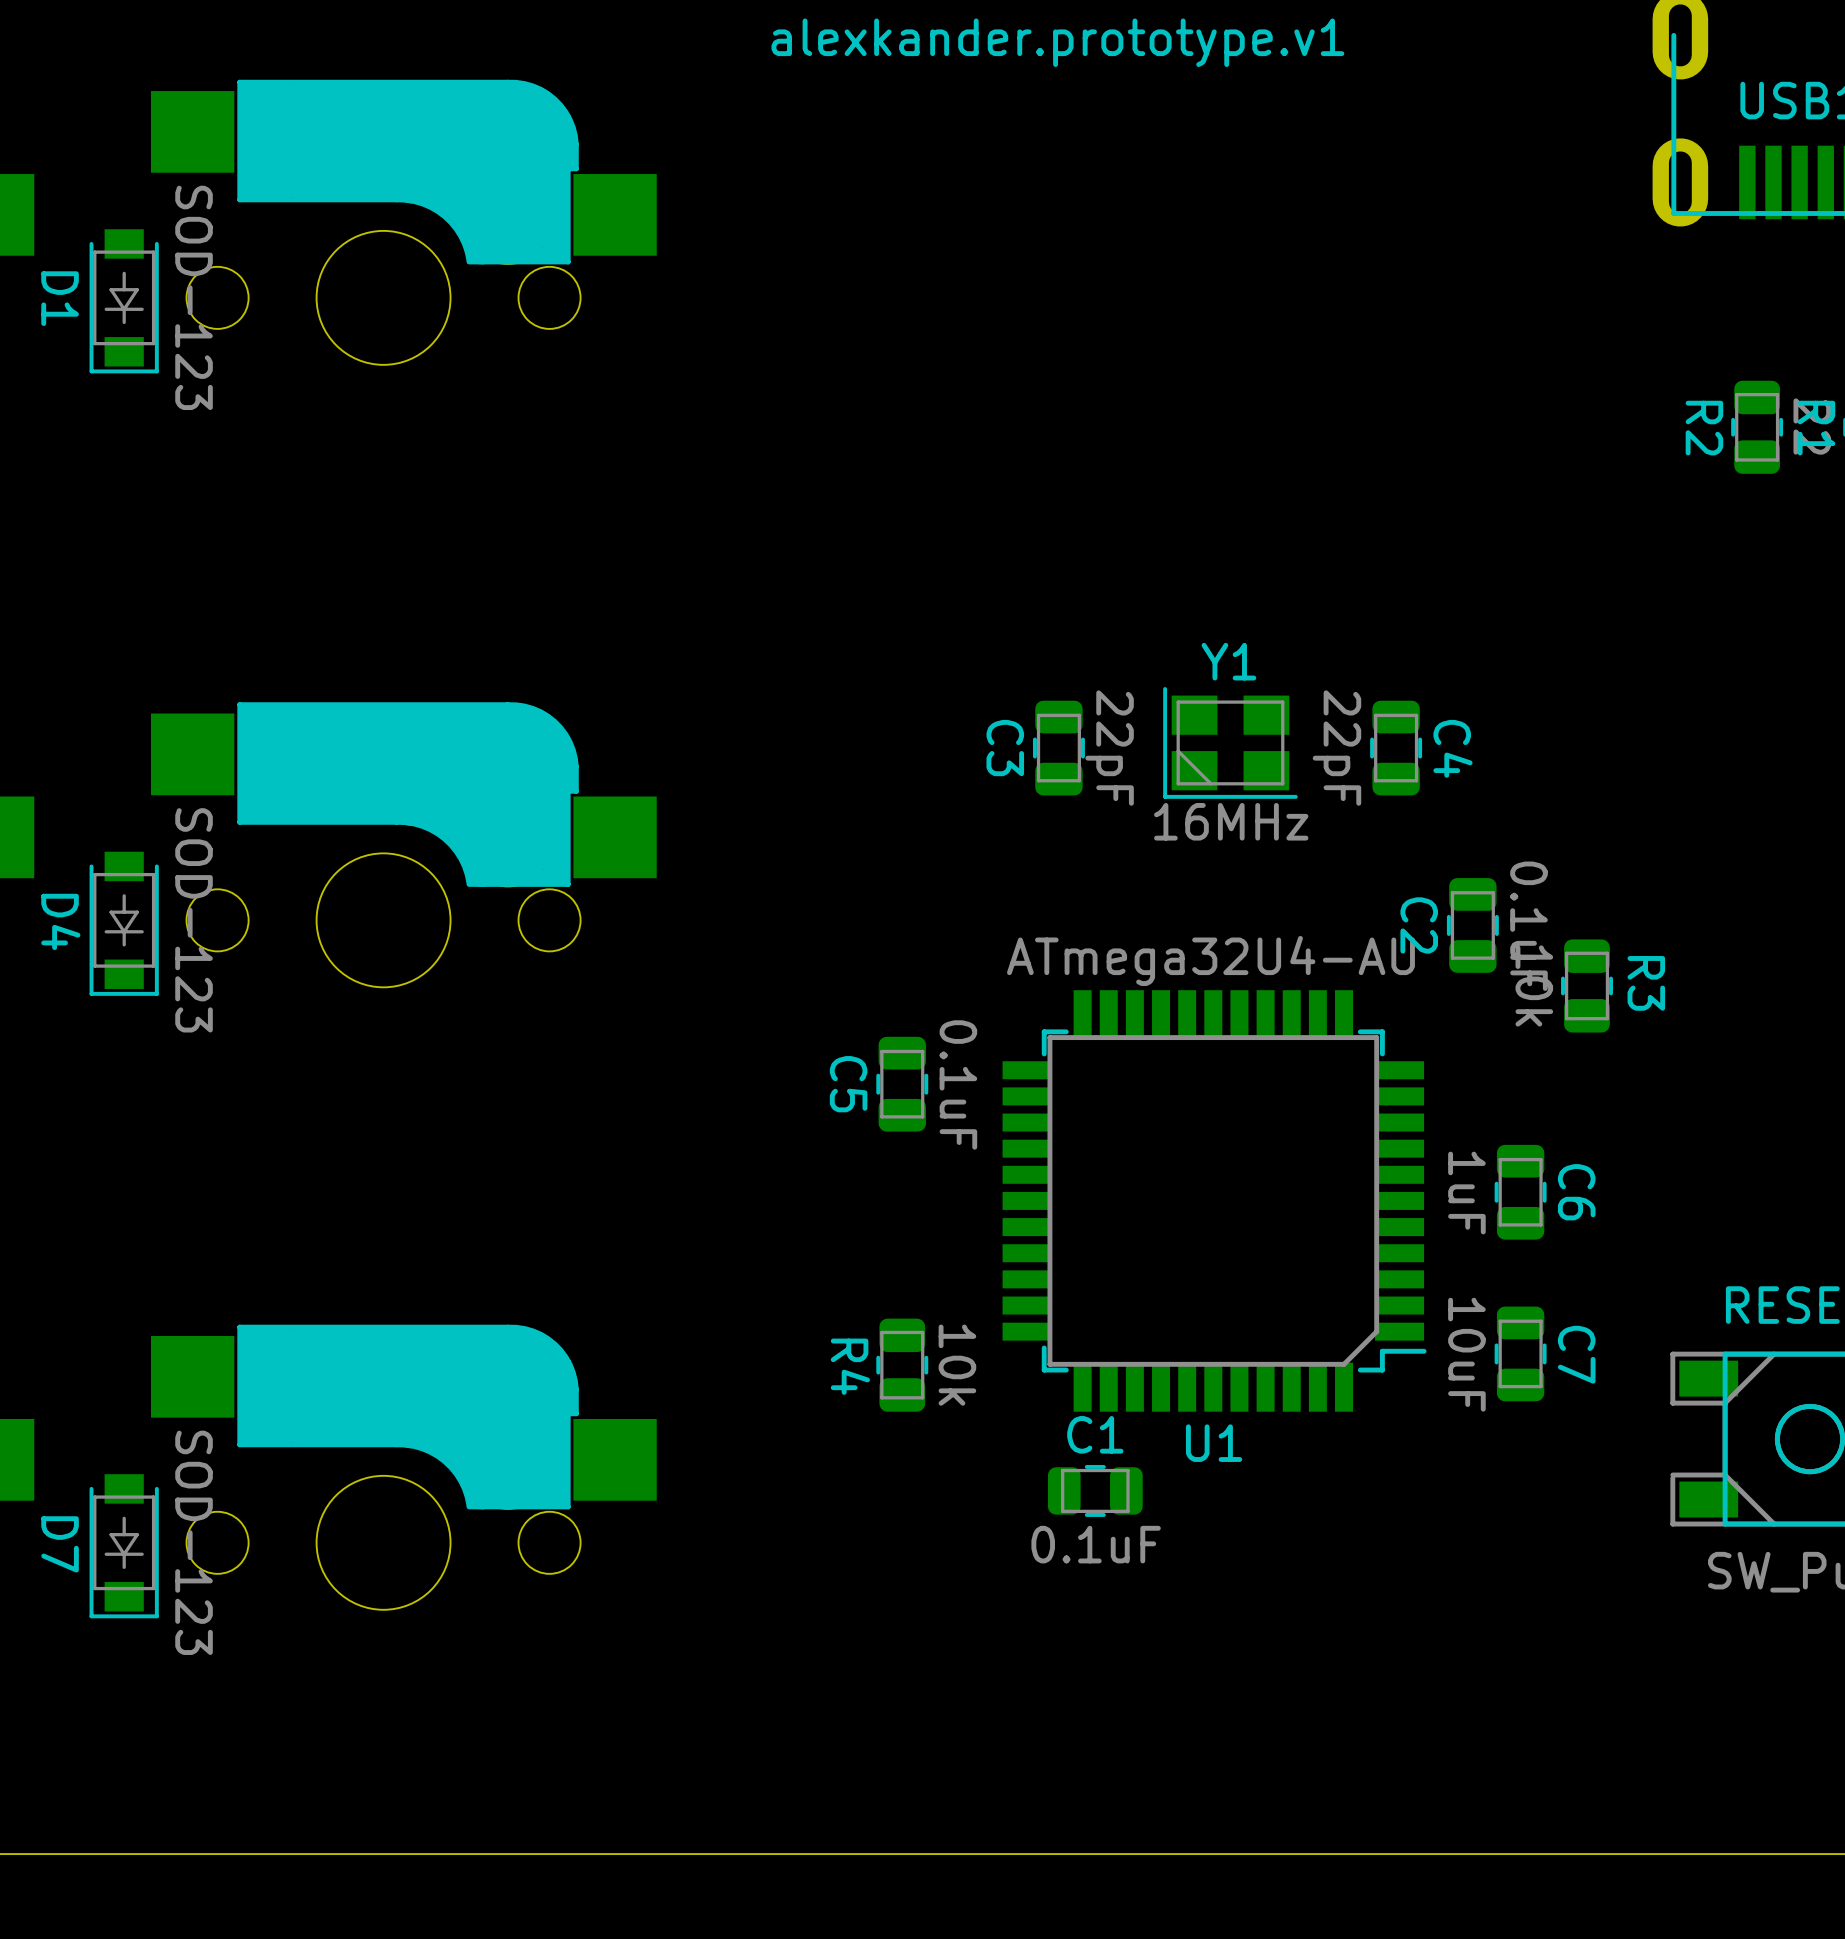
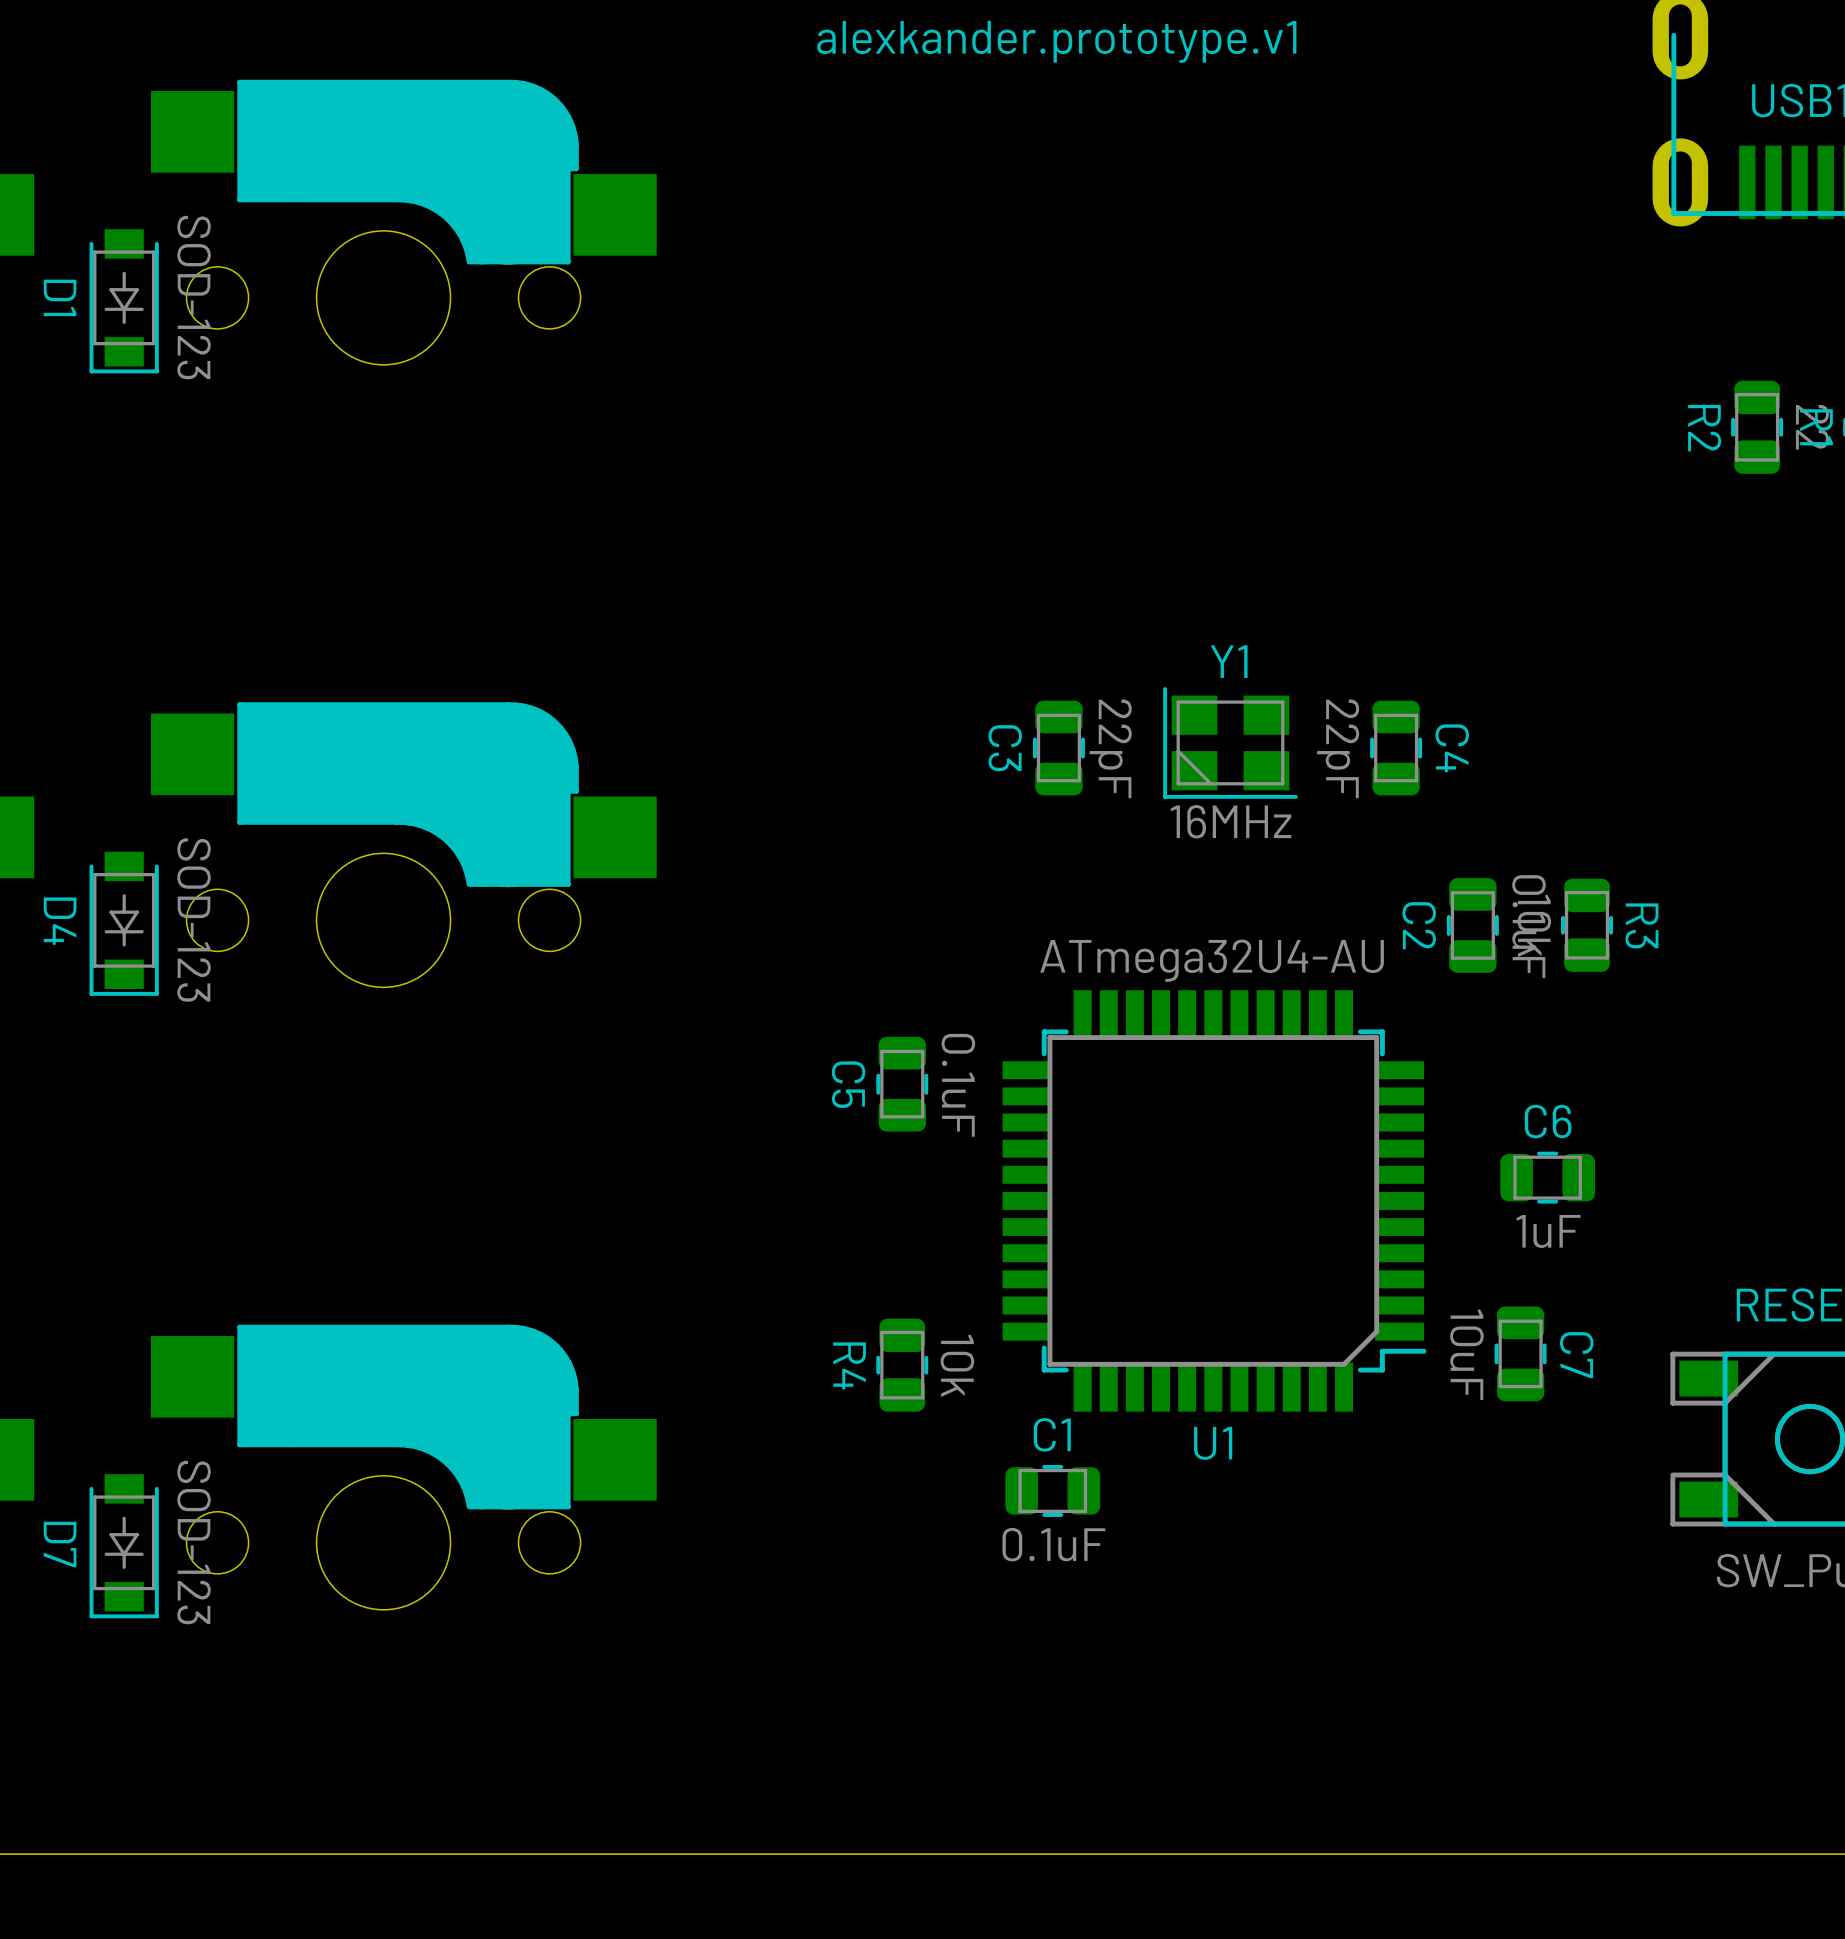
R3 name position: R3 (1646, 983) -> R3 (1641, 925)
R3 position: (1586, 985) -> (1586, 925)
C6 rotation: 0° (1520, 1192) -> 90° clockwise (1547, 1177)
C6 name position: C6 (1576, 1192) -> C6 (1548, 1121)
C6 value position: 1uF (1466, 1193) -> 1uF (1548, 1231)
C1 position: (1095, 1490) -> (1052, 1490)

